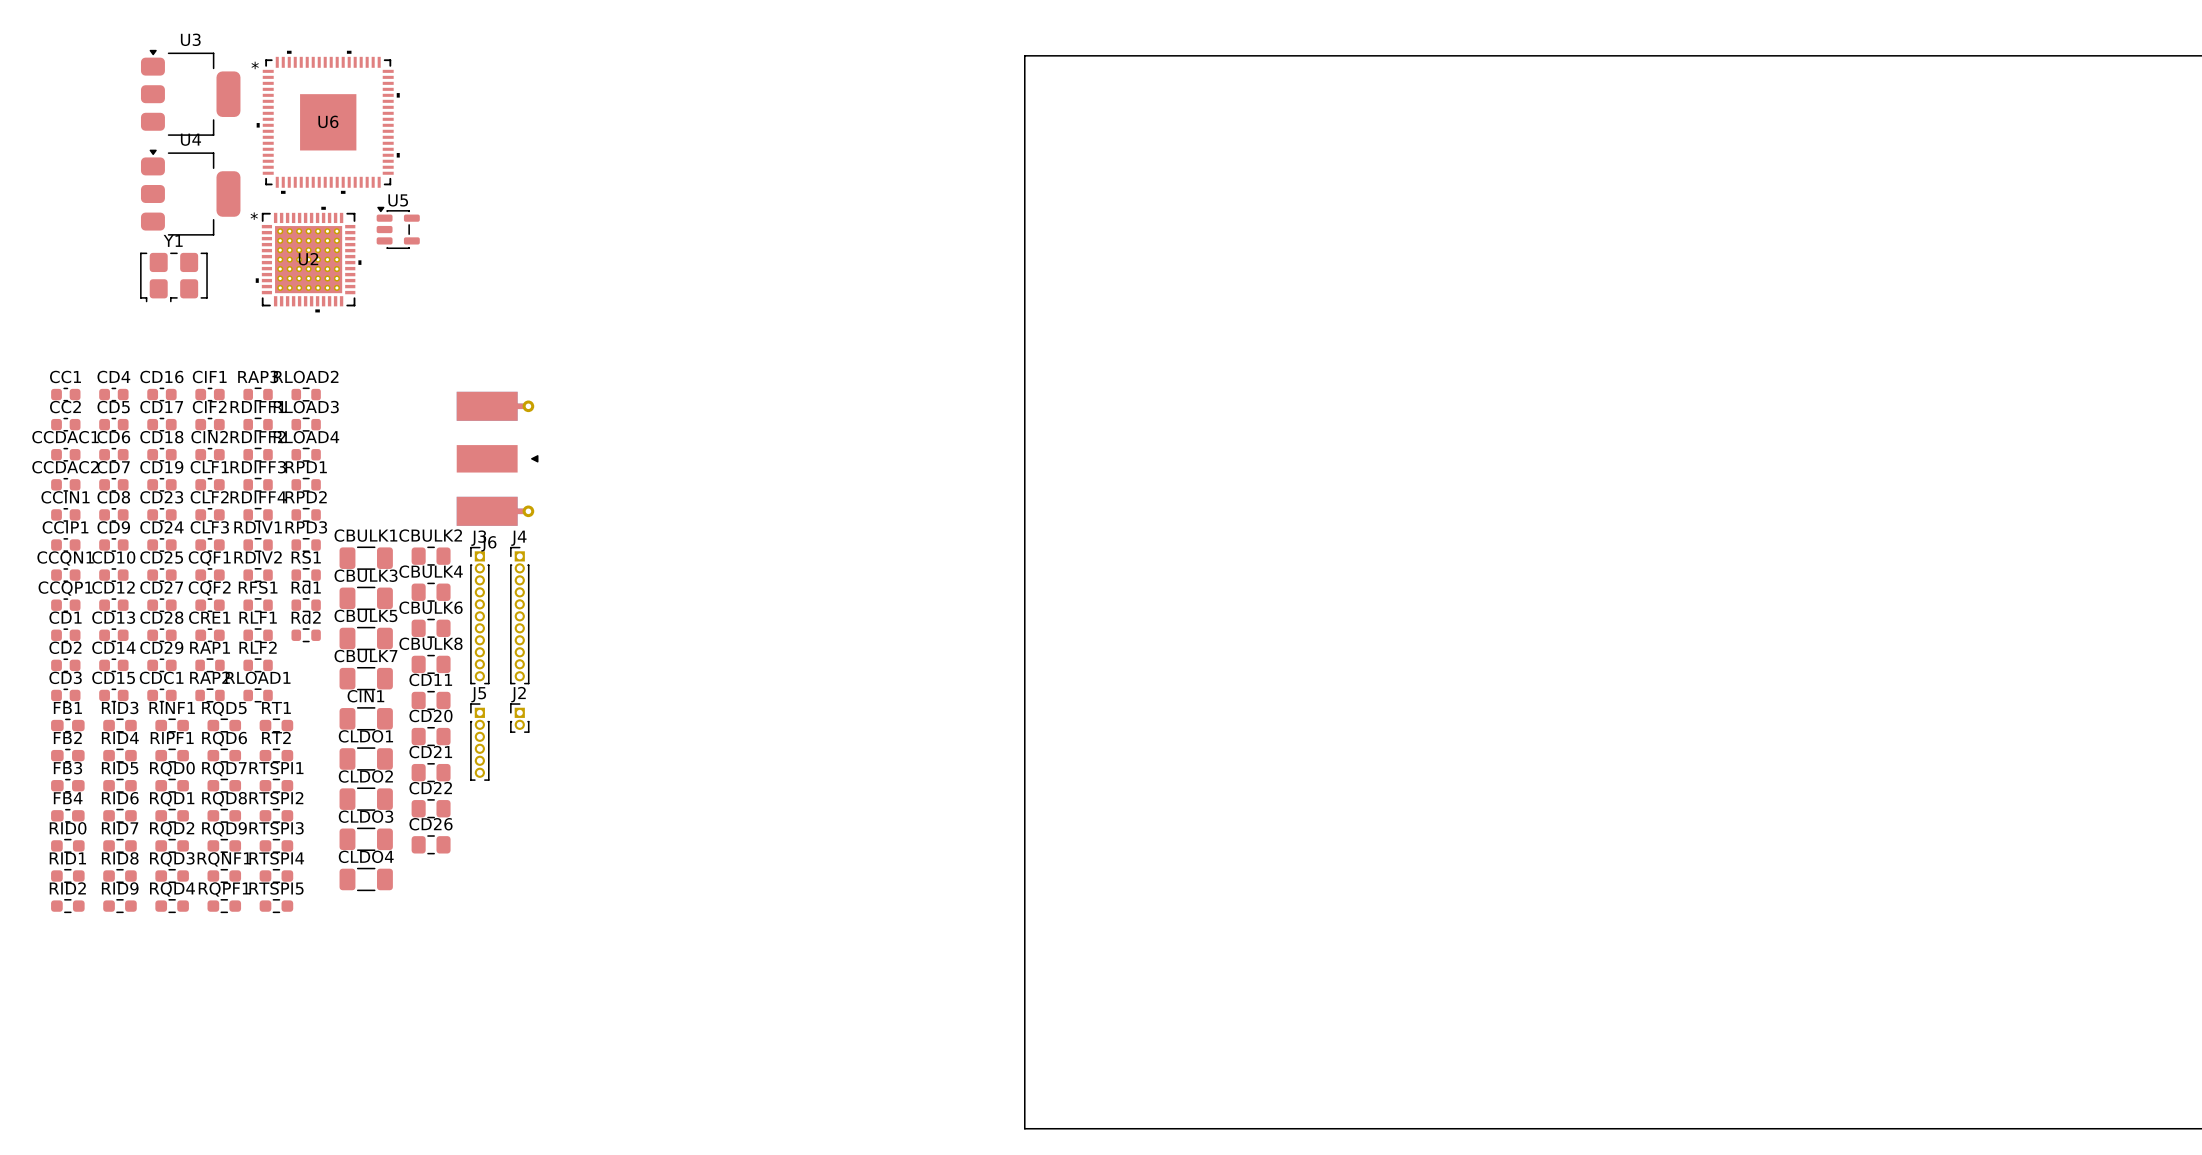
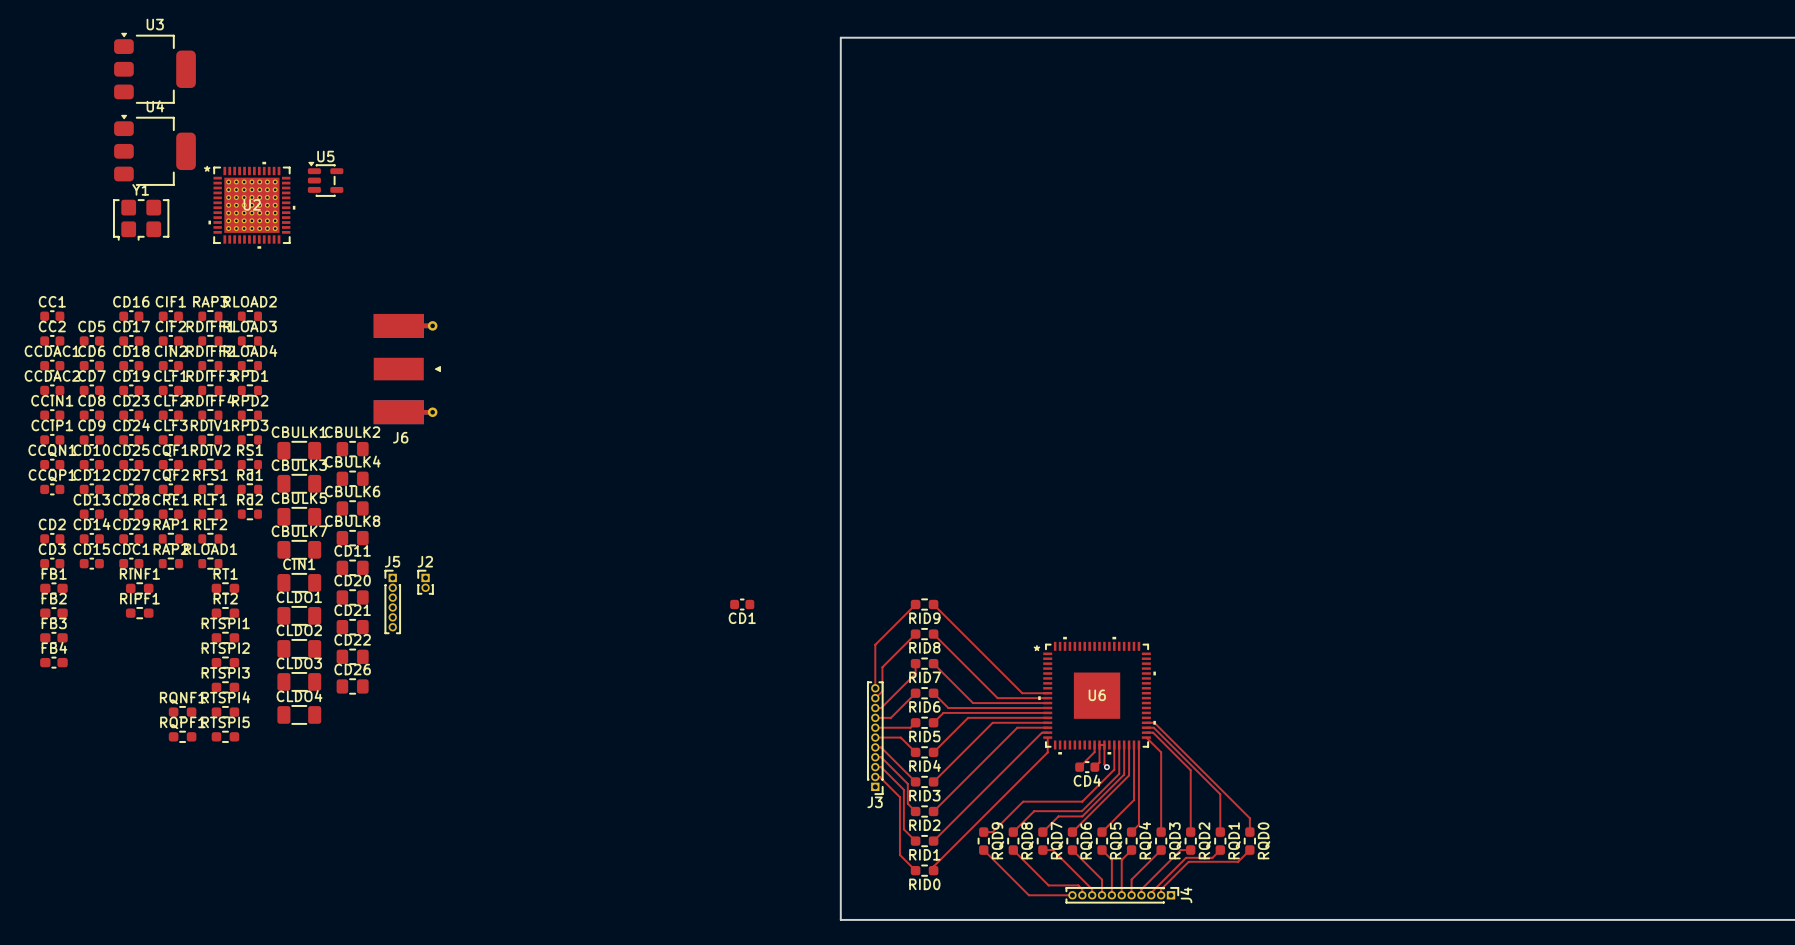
U6 position: (328, 122) -> (1097, 695)
CD4 name position: CD4 (113, 376) -> CD4 (1087, 780)
CD4 position: (113, 394) -> (1087, 767)
J3 rotation: 0° (479, 615) -> 180° (875, 738)
J3 position: (479, 615) -> (875, 738)
J4 rotation: 0° (519, 615) -> 90° clockwise (1122, 895)
J4 position: (519, 615) -> (1122, 895)
CD1 name position: CD1 (65, 617) -> CD1 (742, 618)
CD1 position: (65, 635) -> (742, 604)
RID3 name position: RID3 (120, 707) -> RID3 (924, 795)
RID3 position: (119, 725) -> (924, 781)
RQD5 rotation: 0° (224, 725) -> 90° clockwise (1102, 841)
RQD5 position: (224, 725) -> (1102, 841)
RID4 name position: RID4 (120, 738) -> RID4 (925, 765)
top track: none -> (915, 604) (875, 644) (875, 688)
top track: none -> (933, 604) (1022, 693) (1047, 693)
RID4 position: (119, 755) -> (924, 752)
RQD6 rotation: 0° (224, 755) -> 90° clockwise (1072, 841)
RQD6 position: (224, 755) -> (1072, 841)
RID5 name position: RID5 (120, 768) -> RID5 (924, 736)
top track: none -> (915, 634) (882, 667) (882, 691) (875, 698)
top track: none -> (933, 634) (997, 698) (1047, 698)
RID5 position: (119, 785) -> (924, 722)
RQD0 rotation: 0° (172, 785) -> 90° clockwise (1249, 841)
RQD0 position: (172, 785) -> (1249, 841)
RQD7 rotation: 0° (224, 785) -> 90° clockwise (1042, 841)
RQD7 position: (224, 785) -> (1042, 841)
RID6 name position: RID6 (120, 798) -> RID6 (924, 706)
RID6 position: (119, 815) -> (924, 693)
RQD1 rotation: 0° (172, 815) -> 90° clockwise (1220, 841)
RQD1 position: (172, 815) -> (1220, 841)
RQD8 rotation: 0° (224, 815) -> 90° clockwise (1013, 841)
RQD8 position: (224, 815) -> (1013, 841)
top track: none -> (915, 663) (915, 673) (881, 708) (875, 708)
top track: none -> (933, 663) (973, 703) (1047, 703)
RID0 name position: RID0 (68, 828) -> RID0 (924, 884)
RID7 name position: RID7 (120, 828) -> RID7 (925, 677)
RID0 position: (67, 845) -> (924, 870)
RID7 position: (119, 845) -> (924, 663)
RQD2 rotation: 0° (172, 845) -> 90° clockwise (1190, 841)
RQD2 position: (172, 845) -> (1190, 841)
RQD9 rotation: 0° (224, 845) -> 90° clockwise (983, 841)
RQD9 position: (224, 845) -> (983, 841)
top track: none -> (915, 693) (890, 717) (875, 717)
top track: none -> (933, 693) (948, 708) (1047, 708)
RID1 name position: RID1 (67, 858) -> RID1 (924, 854)
RID8 name position: RID8 (120, 858) -> RID8 (924, 647)
RID1 position: (67, 875) -> (924, 841)
RID8 position: (119, 875) -> (924, 634)
RQD3 rotation: 0° (172, 875) -> 90° clockwise (1161, 841)
RQD3 position: (172, 875) -> (1161, 841)
top track: none -> (1047, 712) (943, 712) (933, 722)
top track: none -> (1047, 717) (968, 717) (933, 752)
RID2 name position: RID2 (67, 888) -> RID2 (924, 825)
RID9 name position: RID9 (120, 888) -> RID9 (924, 618)
top track: none -> (915, 722) (910, 727) (875, 727)
top track: none -> (1047, 722) (992, 722) (933, 781)
top track: none -> (1146, 722) (1154, 722) (1249, 818) (1249, 832)
top track: none -> (1047, 727) (1017, 727) (933, 811)
top track: none -> (1146, 727) (1153, 727) (1220, 794) (1220, 832)
top track: none -> (1047, 732) (1042, 732) (933, 841)
top track: none -> (1146, 732) (1153, 732) (1190, 770) (1190, 832)
RID2 position: (67, 906) -> (924, 811)
RID9 position: (119, 906) -> (924, 604)
RQD4 rotation: 0° (172, 906) -> 90° clockwise (1131, 841)
RQD4 position: (172, 906) -> (1131, 841)
top track: none -> (875, 737) (900, 737) (915, 752)
top track: none -> (1047, 737) (1047, 752) (933, 866) (933, 870)
top track: none -> (1146, 737) (1161, 752) (1161, 832)
top track: none -> (1094, 745) (1094, 752) (1079, 767)
top track: none -> (1099, 745) (1099, 762) (1094, 767)
top track: none -> (1099, 745) (1104, 745) (1104, 764) (1106, 767)
top track: none -> (1114, 745) (1114, 769) (1082, 801) (1023, 801) (992, 832) (983, 832)
top track: none -> (1119, 745) (1119, 773) (1081, 811) (1034, 811) (1013, 832)
top track: none -> (1124, 745) (1124, 774) (1082, 816) (1058, 816) (1042, 832)
top track: none -> (1129, 745) (1129, 775) (1072, 832)
top track: none -> (1134, 745) (1134, 800) (1102, 832)
top track: none -> (1138, 745) (1138, 824) (1131, 832)
top track: none -> (875, 747) (881, 747) (915, 781)
top track: none -> (875, 757) (881, 757) (907, 783) (907, 803) (915, 811)
top track: none -> (875, 767) (881, 767) (903, 789) (903, 829) (915, 841)
via: none -> (1106, 767)
top track: none -> (875, 777) (879, 777) (899, 797) (899, 855) (915, 870)
top track: none -> (983, 850) (1028, 895) (1072, 895)
top track: none -> (1013, 850) (1048, 885) (1078, 885) (1082, 889) (1082, 895)
top track: none -> (1042, 850) (1052, 850) (1092, 889) (1092, 895)
top track: none -> (1072, 850) (1102, 879) (1102, 895)
top track: none -> (1102, 850) (1111, 859) (1111, 895)
top track: none -> (1131, 850) (1121, 859) (1121, 895)
top track: none -> (1161, 850) (1131, 879) (1131, 895)
top track: none -> (1190, 850) (1180, 850) (1141, 889) (1141, 895)
top track: none -> (1220, 850) (1212, 857) (1186, 857) (1151, 892) (1151, 895)
top track: none -> (1249, 850) (1238, 861) (1188, 861) (1161, 889) (1161, 895)

